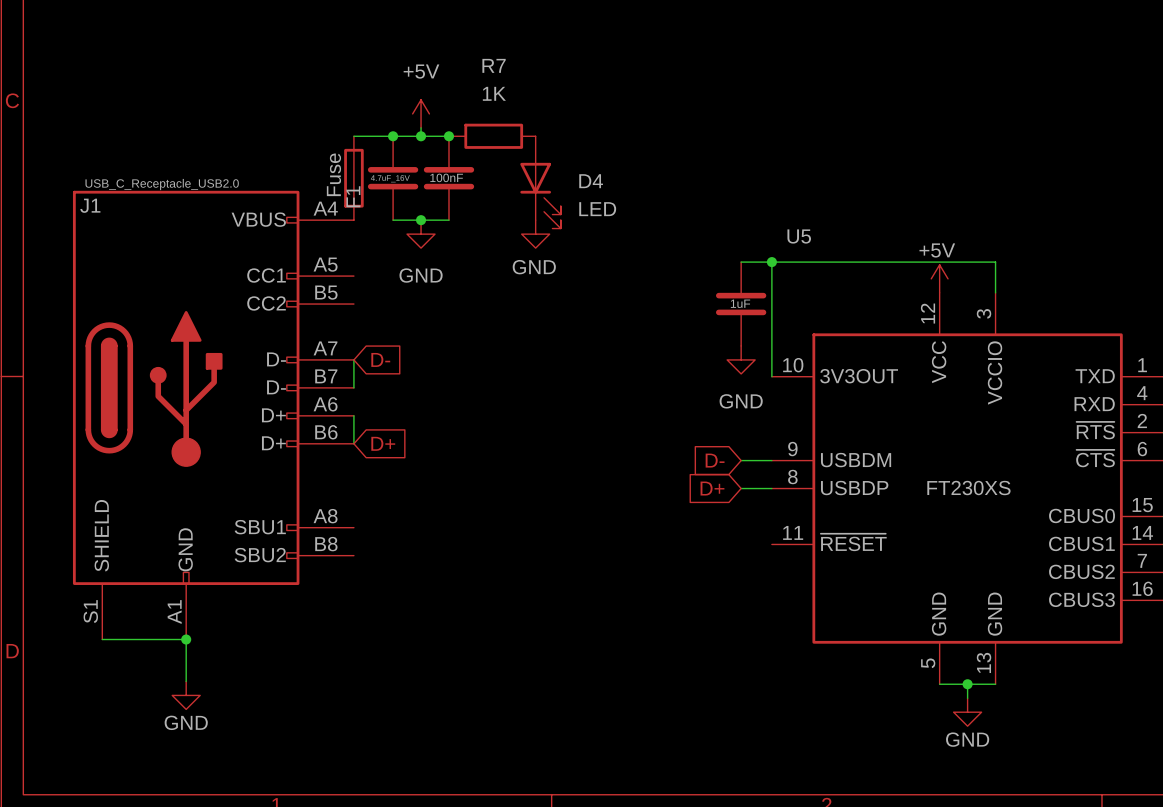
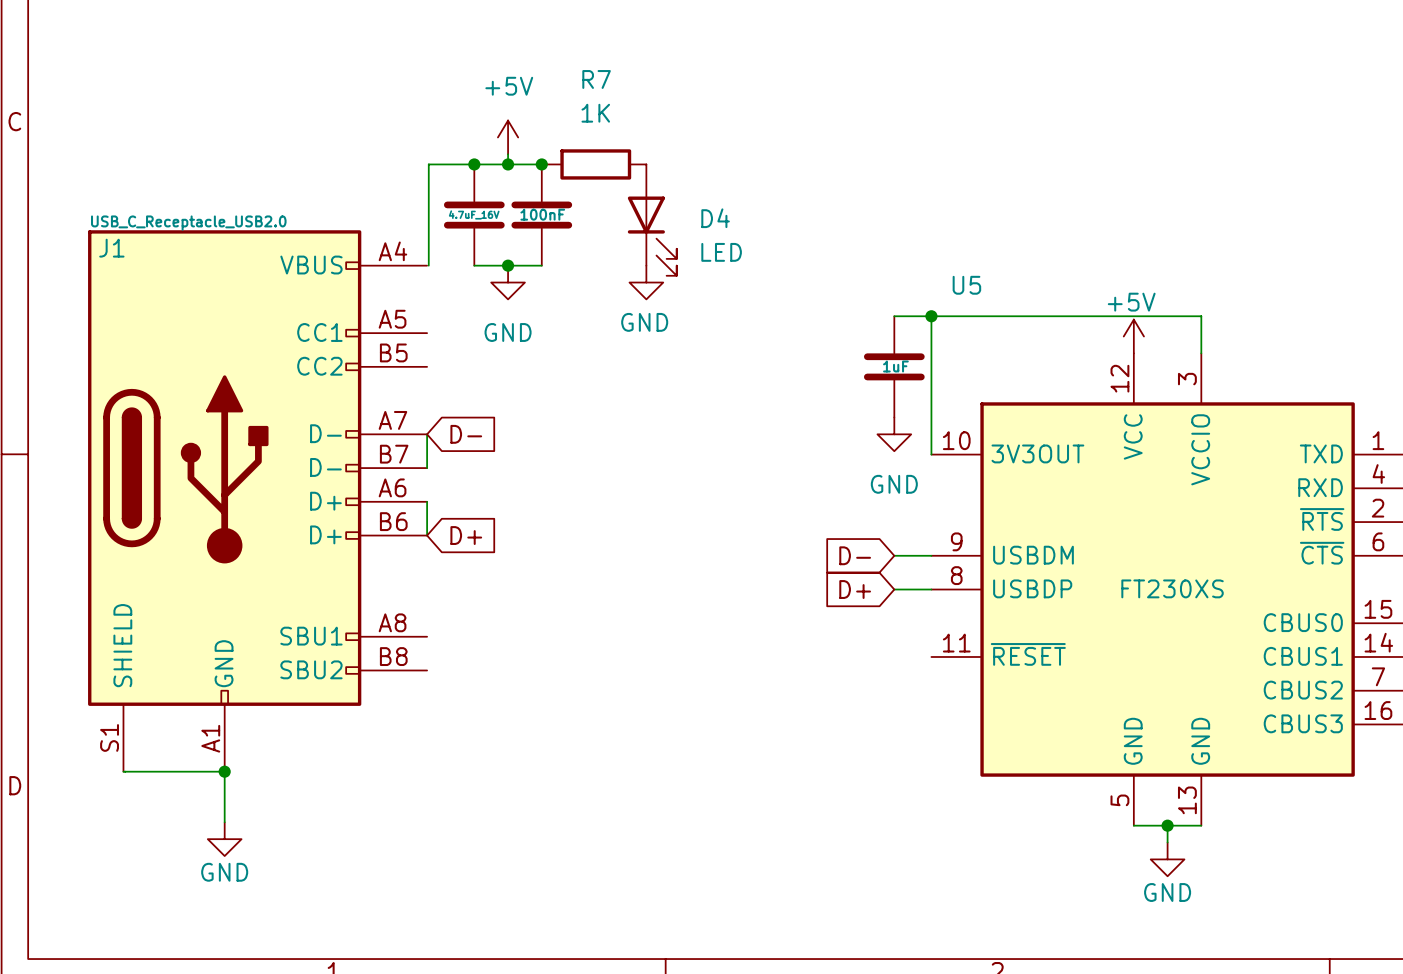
wire: (353, 136) (355, 136) -> (428, 265) (428, 164)
F1: Fuse (353, 178) -> none

